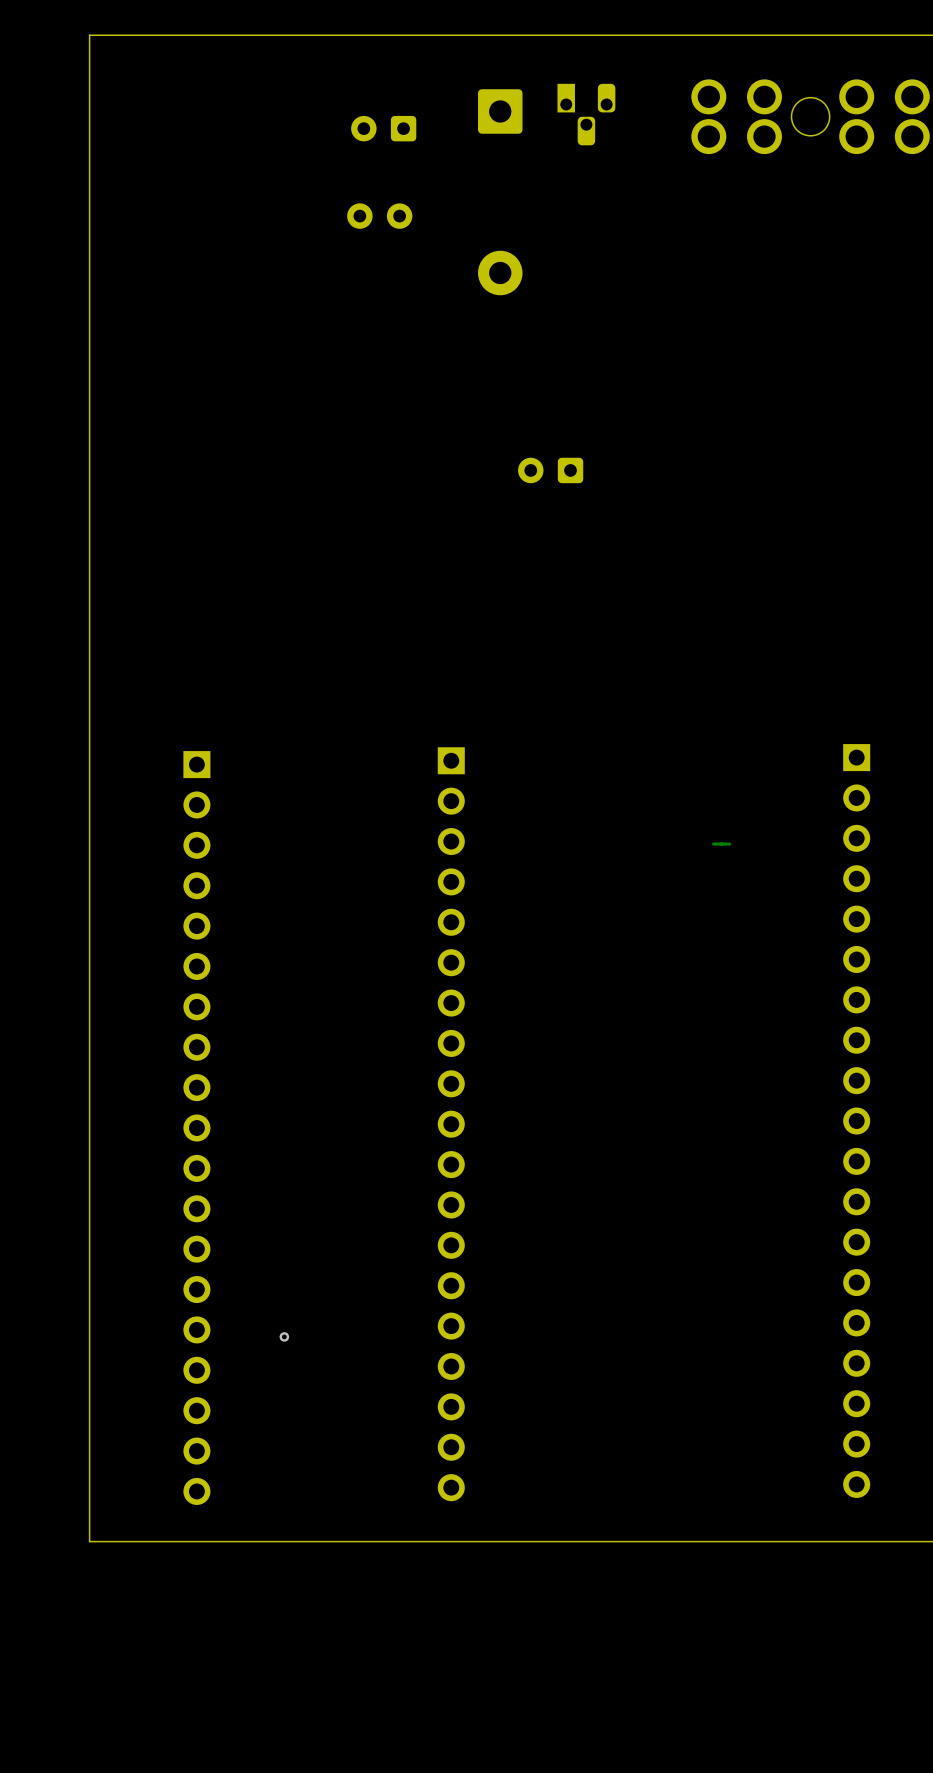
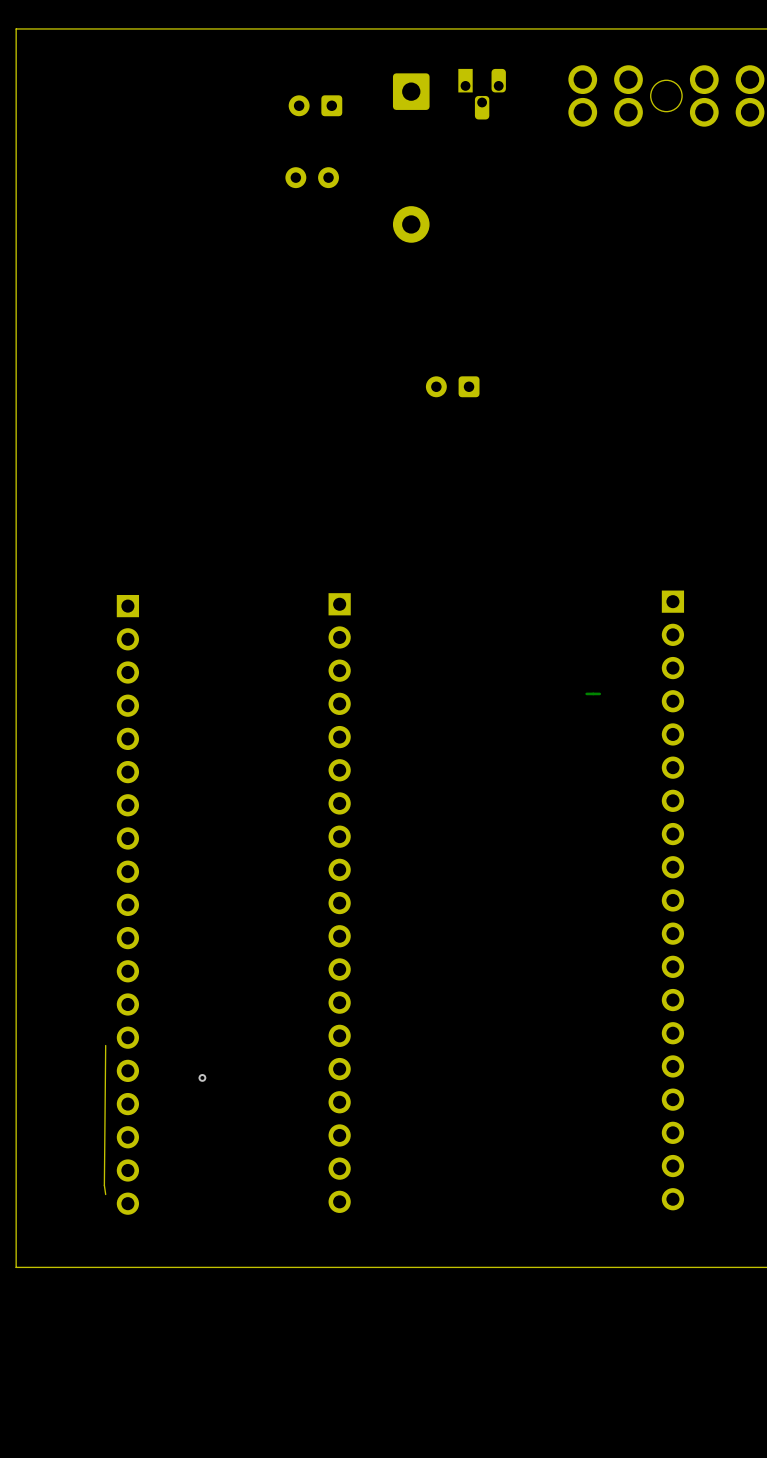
board edge: (89, 35) (89, 1541) -> (73, 28) (16, 28) (16, 1267) (73, 1267)
part position: (856, 1121) -> (672, 900)
part position: (451, 1124) -> (339, 903)
part position: (196, 1128) -> (127, 904)
board edge: none -> (105, 1045) (105, 1194)
via position: (284, 1336) -> (202, 1077)

